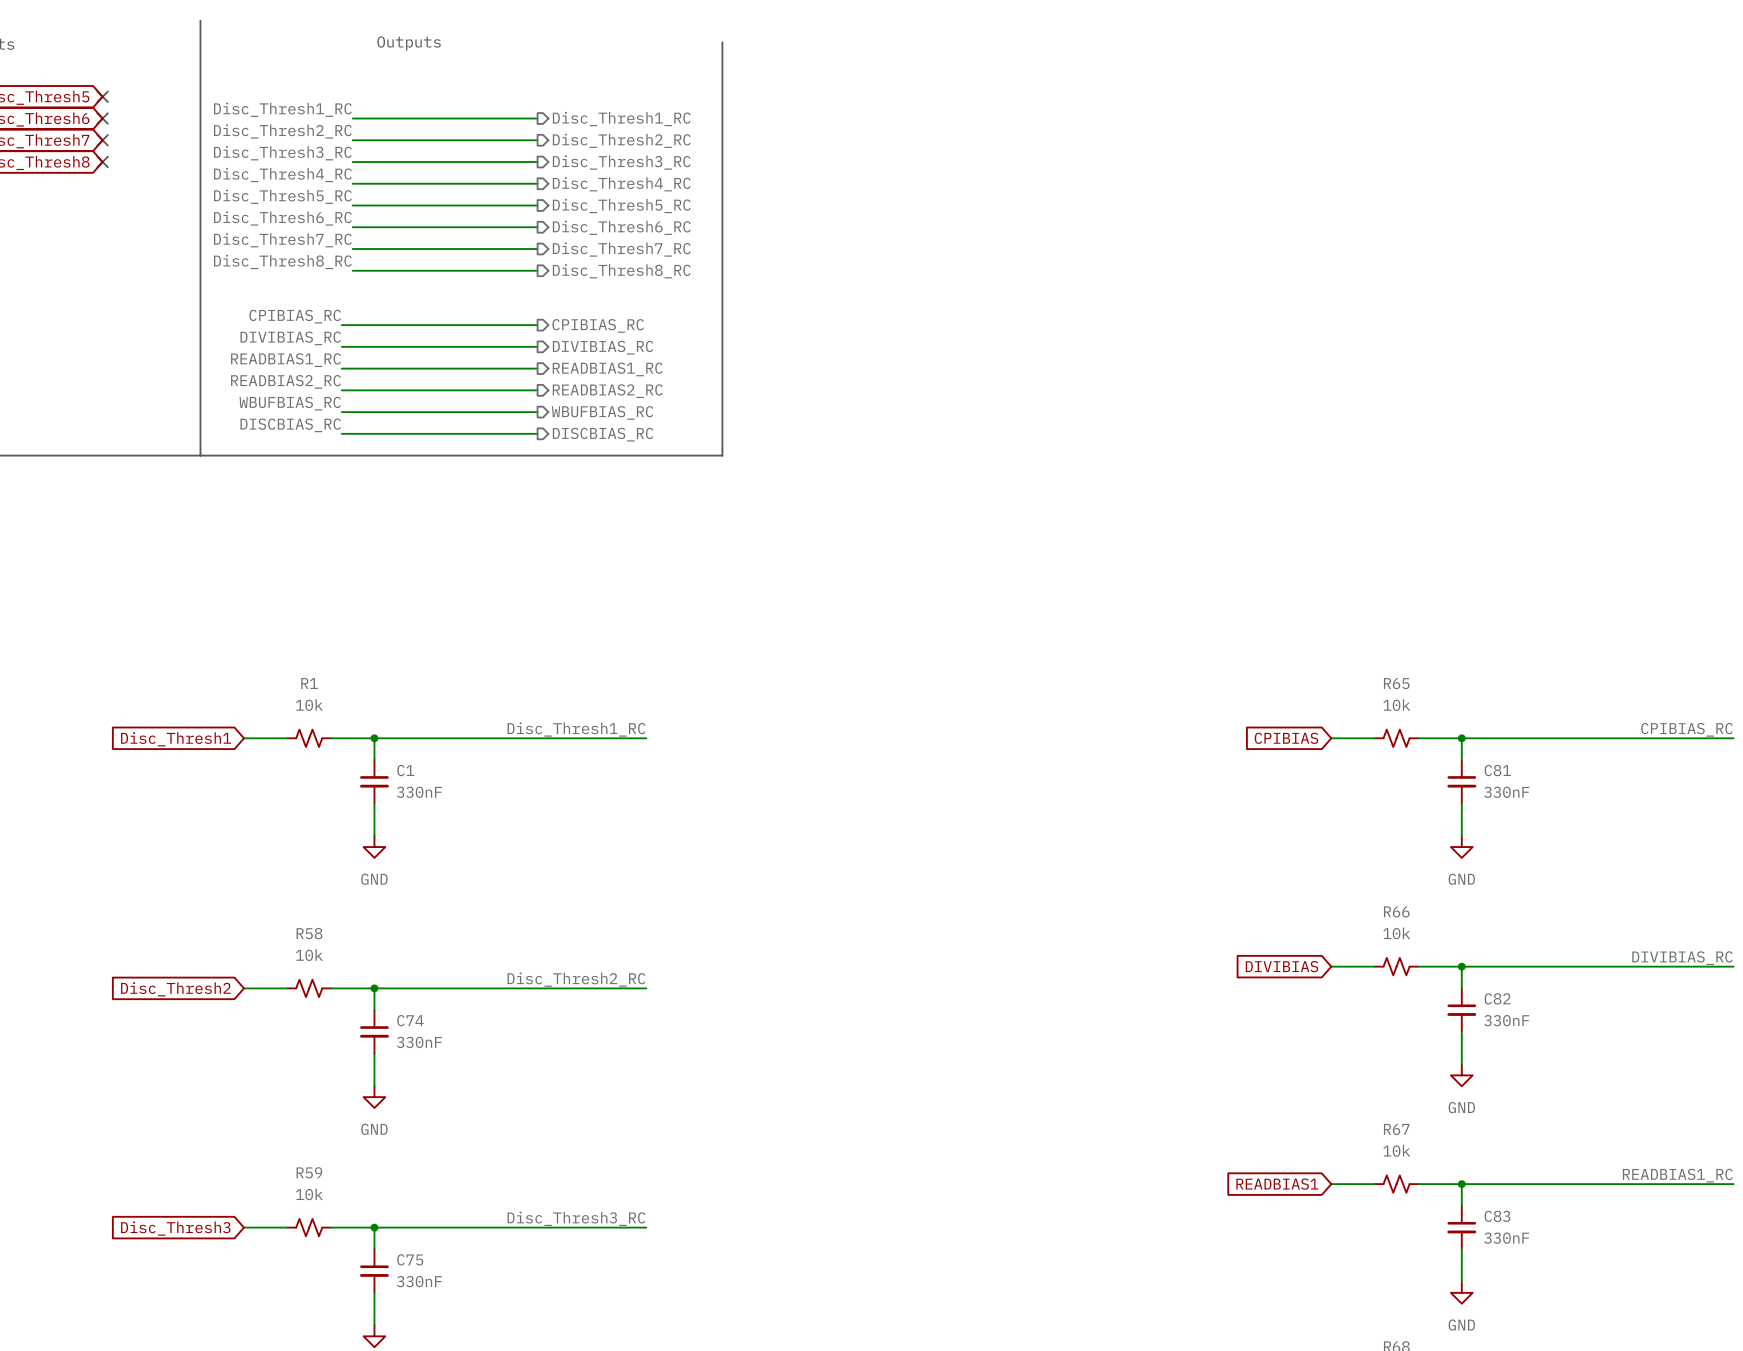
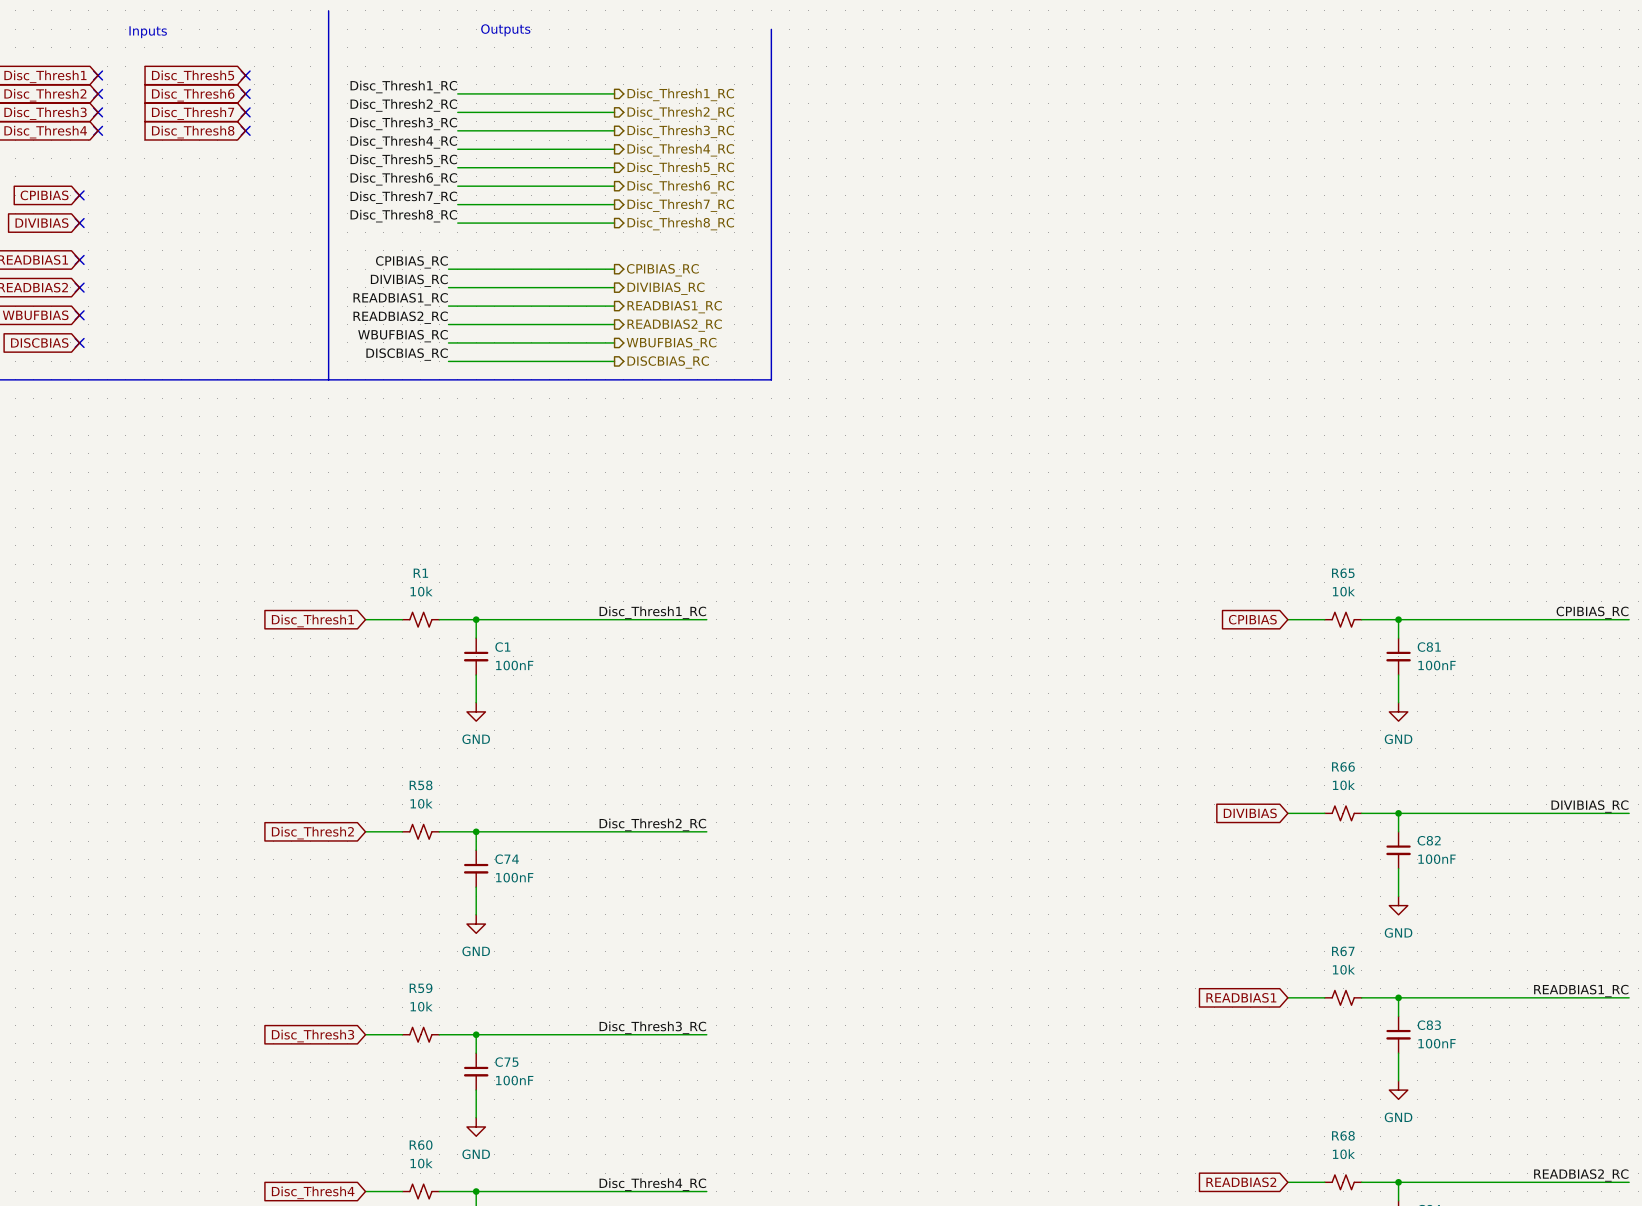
C1 value: 330nF (419, 792) -> 100nF (514, 665)
C81 value: 330nF (1506, 792) -> 100nF (1437, 665)
C82 value: 330nF (1506, 1020) -> 100nF (1437, 859)
C74 value: 330nF (419, 1042) -> 100nF (514, 877)
C83 value: 330nF (1506, 1238) -> 100nF (1437, 1043)
C75 value: 330nF (419, 1281) -> 100nF (514, 1080)

